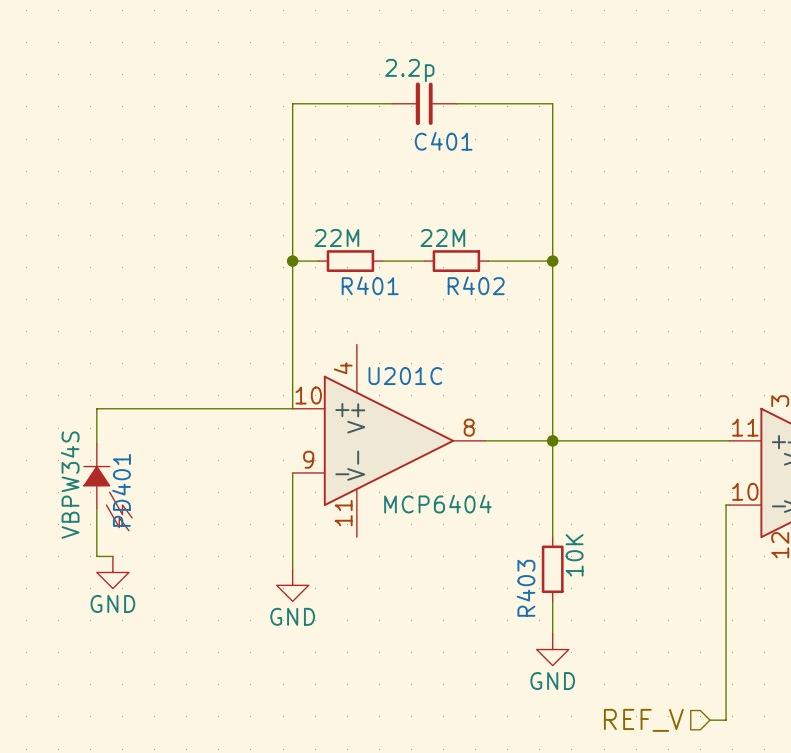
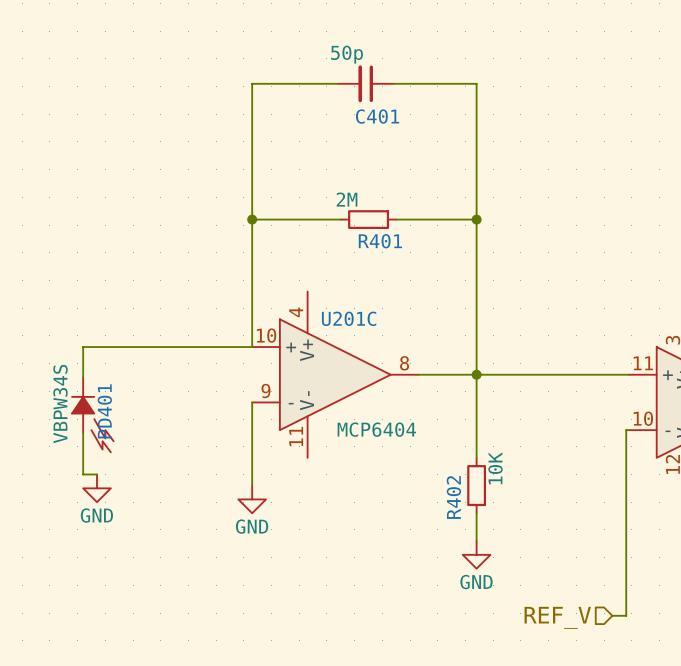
C401 value: 2.2p (409, 70) -> 50p (347, 54)
R401 value: 22M (336, 238) -> 2M (347, 199)
wire: none -> (274, 219) (329, 219)
R401 position: (350, 261) -> (368, 219)
wire: (395, 261) (424, 261) -> (396, 219) (421, 219)
R402: 22M (456, 261) -> none
R403 name: R403 (526, 588) -> R402 (453, 497)

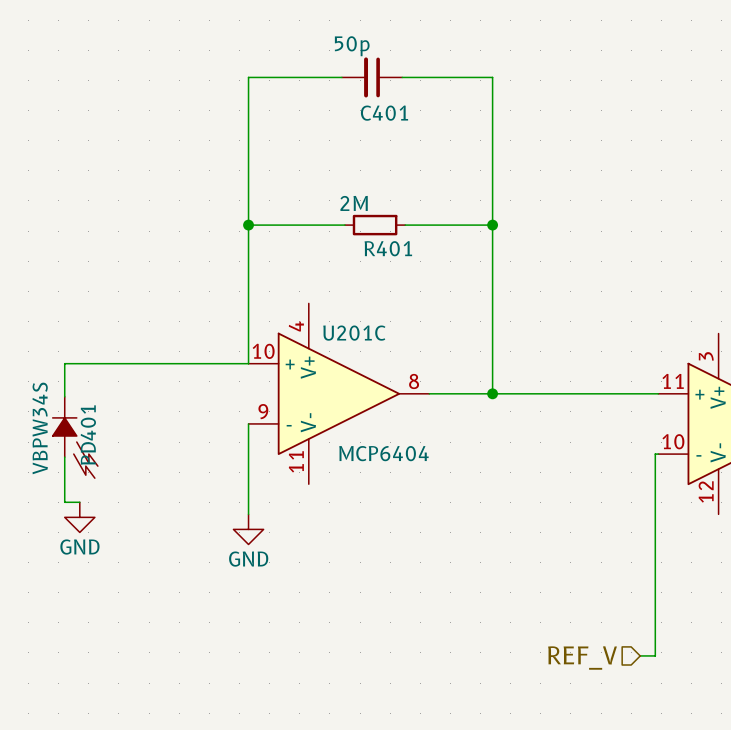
wire: (476, 374) (476, 457) -> none
R402: 10K (476, 485) -> none
wire: (476, 513) (476, 540) -> none
power symbol: GND (476, 554) -> none

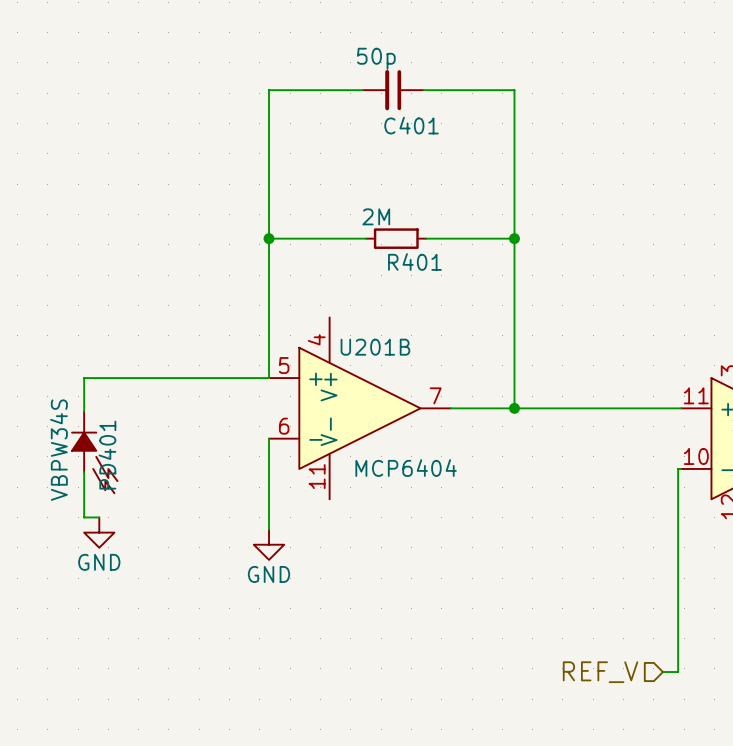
U201C name: U201C (354, 333) -> U201B (375, 347)
U201C pin number: 10 (263, 351) -> 5 (284, 365)
U201C pin number: 8 (414, 381) -> 7 (435, 395)
U201C pin number: 9 (263, 411) -> 6 (284, 426)

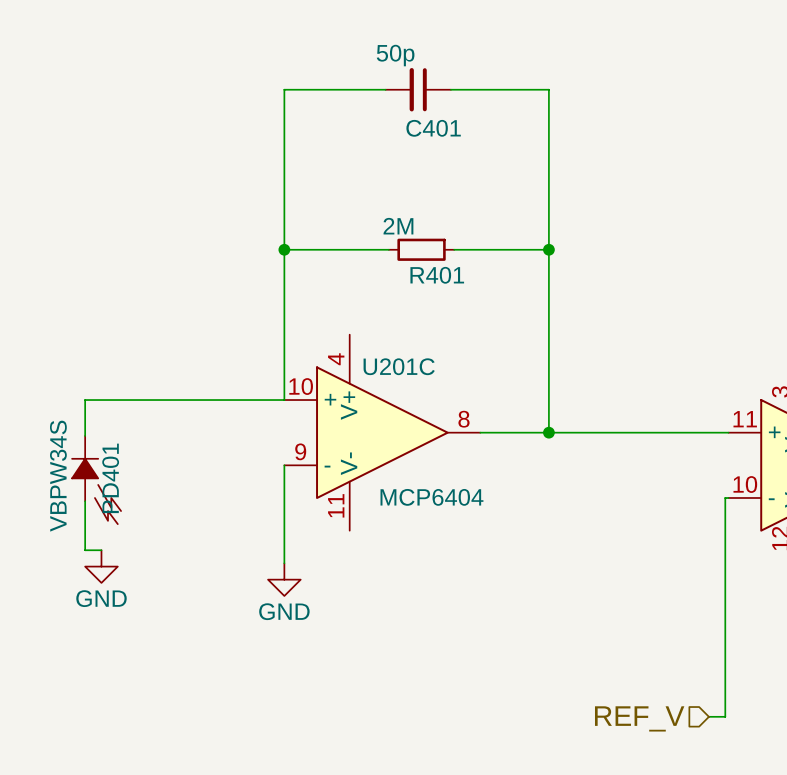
U201B name: U201B (375, 347) -> U201C (399, 366)
U201B pin number: 5 (284, 365) -> 10 (301, 386)
U201B pin number: 7 (435, 395) -> 8 (464, 419)
U201B pin number: 6 (284, 426) -> 9 (300, 451)

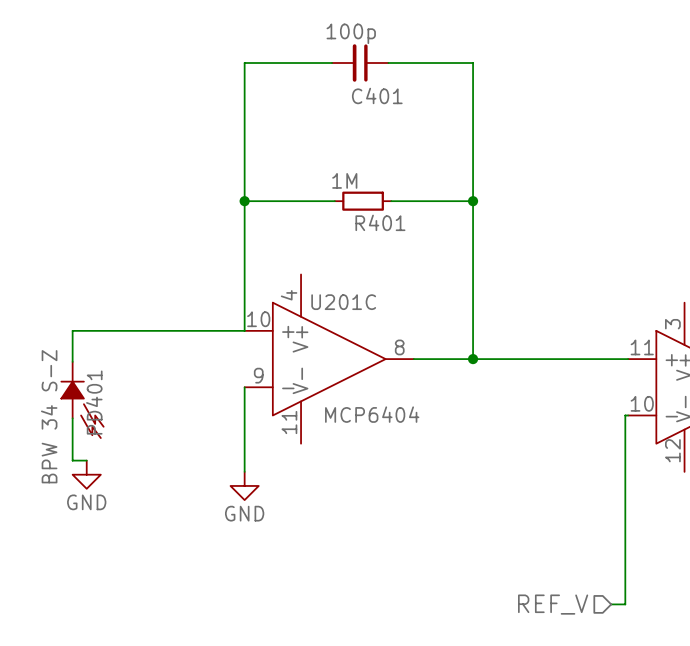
C401 value: 50p (395, 55) -> 100p (351, 33)
R401 value: 2M (398, 226) -> 1M (344, 180)
PD401 value: VBPW34S (58, 476) -> BPW 34 S-Z (49, 416)

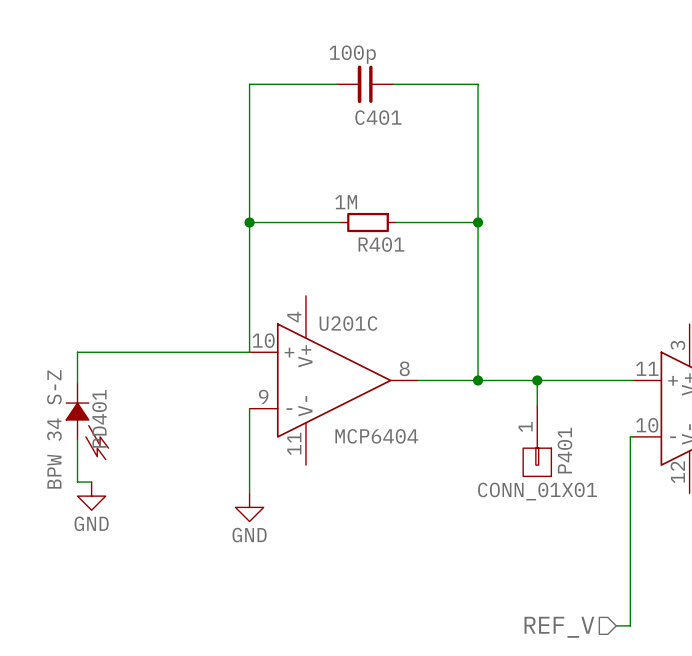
wire: none -> (537, 380) (537, 405)
junction: none -> (537, 380)
P401: none -> CONN_01X01 (537, 441)

